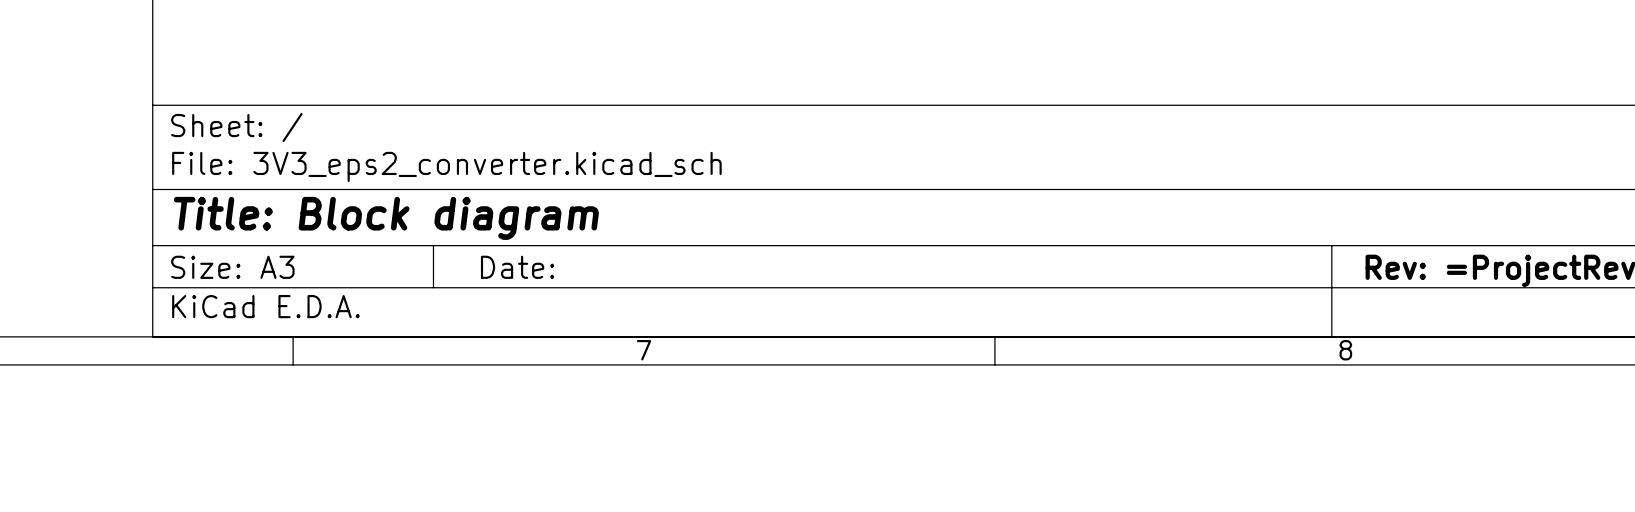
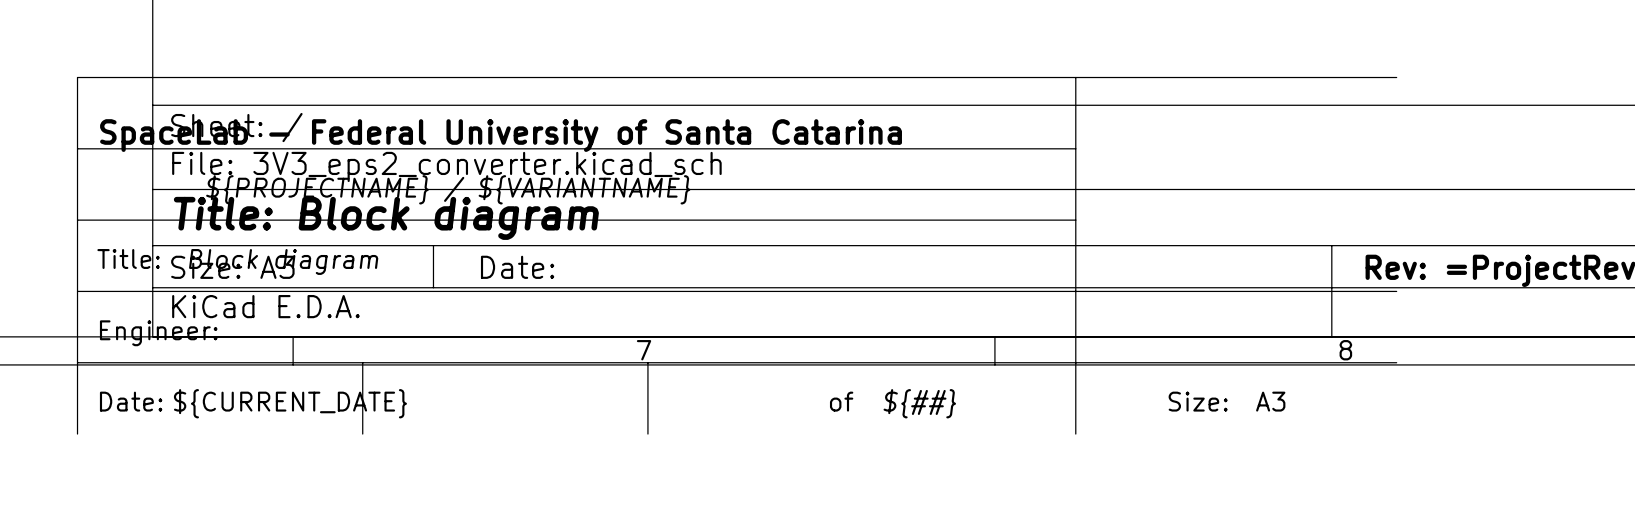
line: none -> (1075, 77) (1075, 434)
line: none -> (1396, 77) (77, 77) (77, 434)
text: none -> SpaceLab - Federal University of Santa Catarina (501, 135)
line: none -> (77, 148) (1075, 148)
text: none -> ${PROJECTNAME} / ${VARIANTNAME} (448, 189)
line: none -> (77, 220) (1075, 220)
text: none -> Title: (128, 258)
text: none -> Block diagram (283, 261)
line: none -> (77, 291) (1396, 291)
text: none -> Engineer: (158, 333)
line: none -> (77, 362) (1396, 362)
line: none -> (362, 362) (362, 434)
line: none -> (647, 362) (647, 434)
text: none -> Date: (131, 401)
text: none -> of (841, 401)
text: none -> Size: (1198, 401)
text: none -> A3 (1270, 401)
text: none -> ${CURRENT_DATE} (290, 403)
text: none -> ${##} (919, 403)

